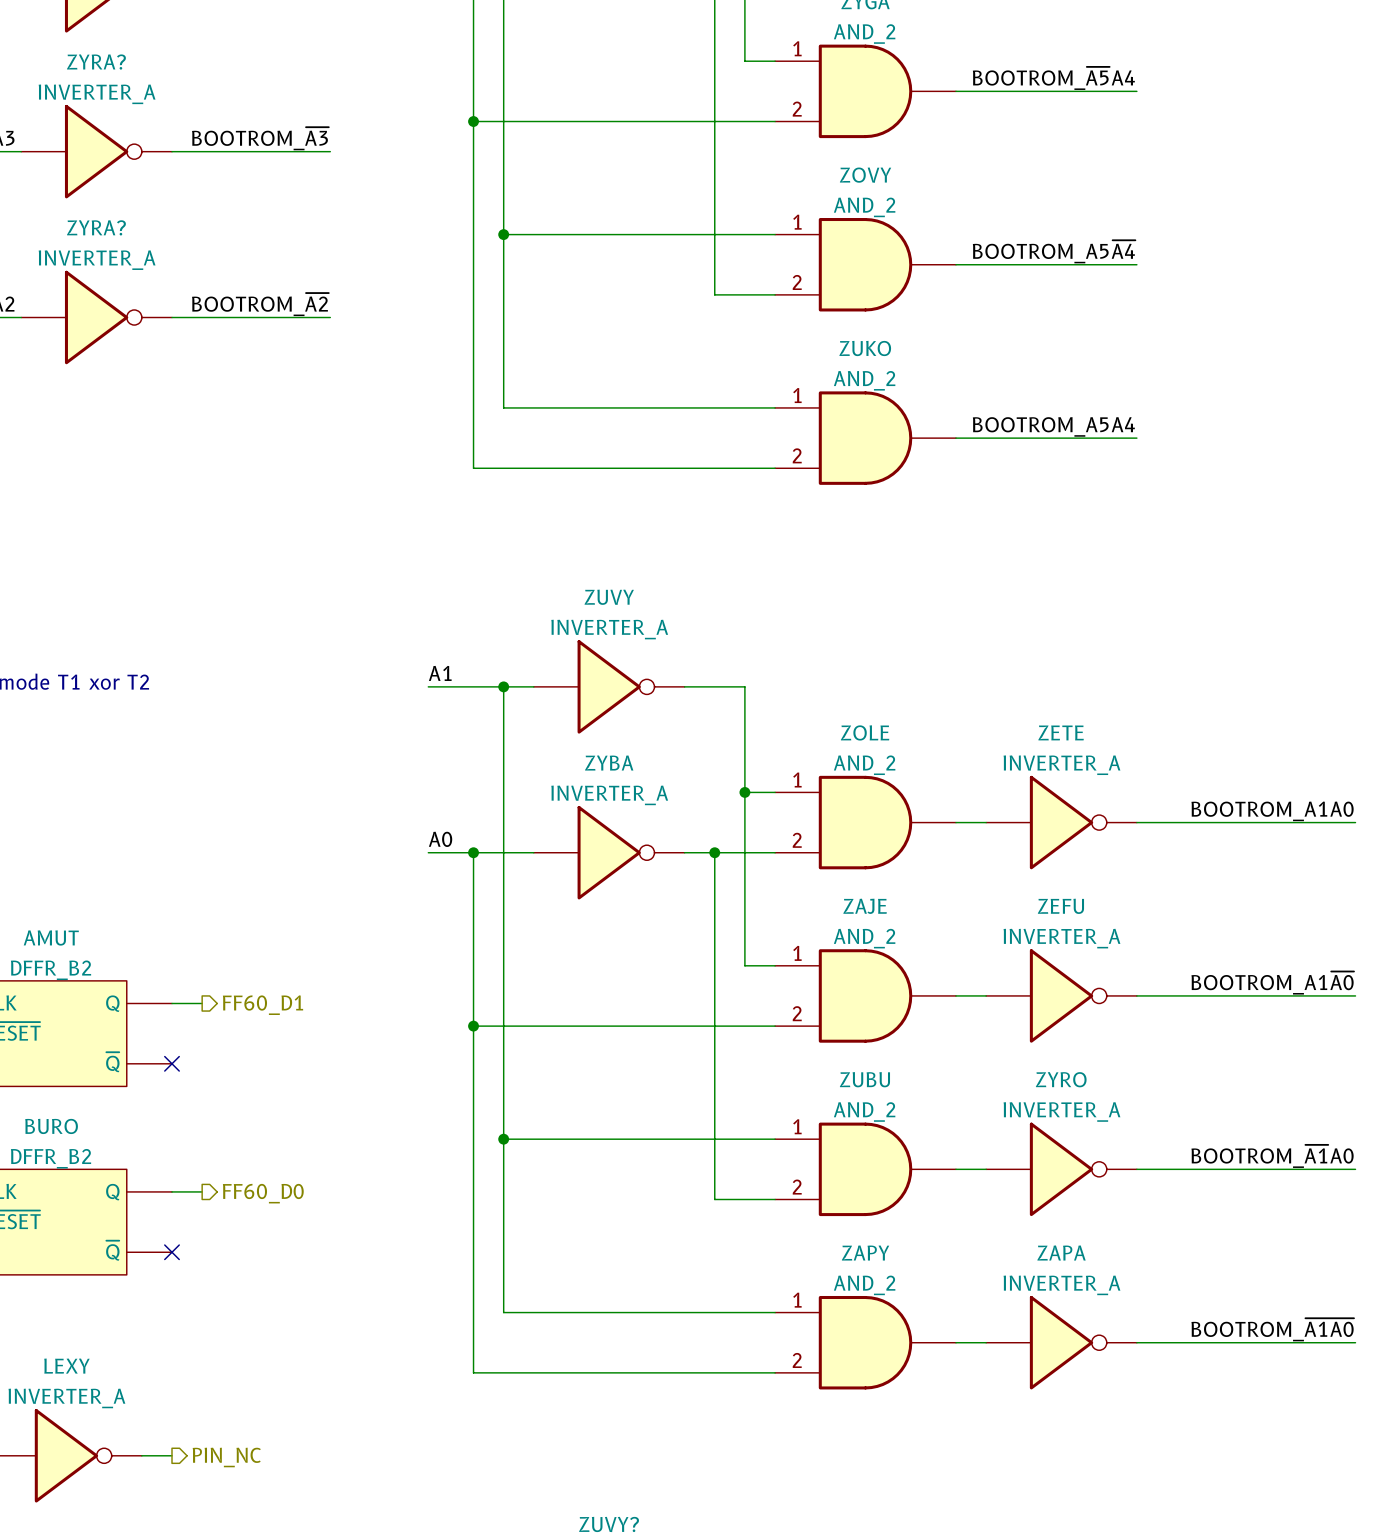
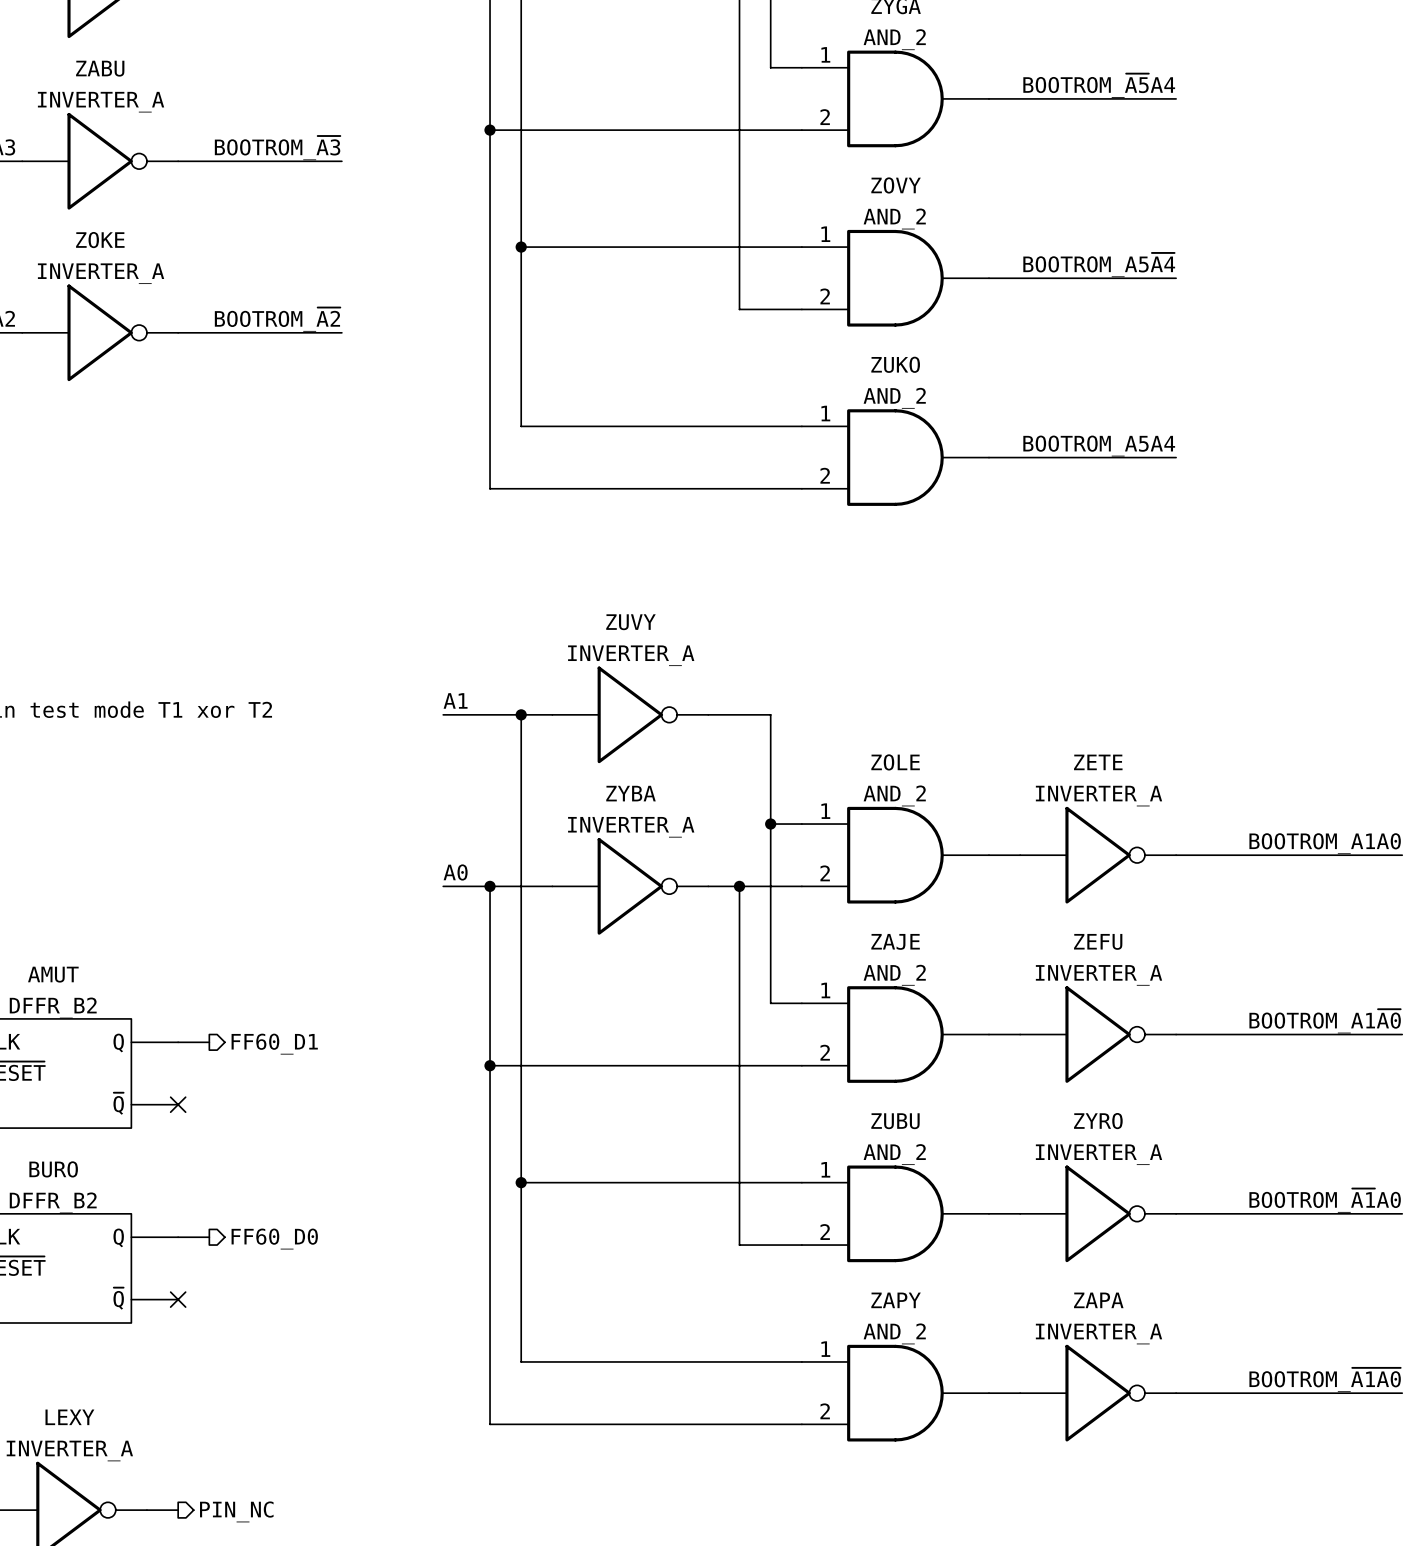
ZYRA? name: ZYRA? (96, 62) -> ZABU (100, 68)
ZYRA? name: ZYRA? (96, 227) -> ZOKE (100, 240)

